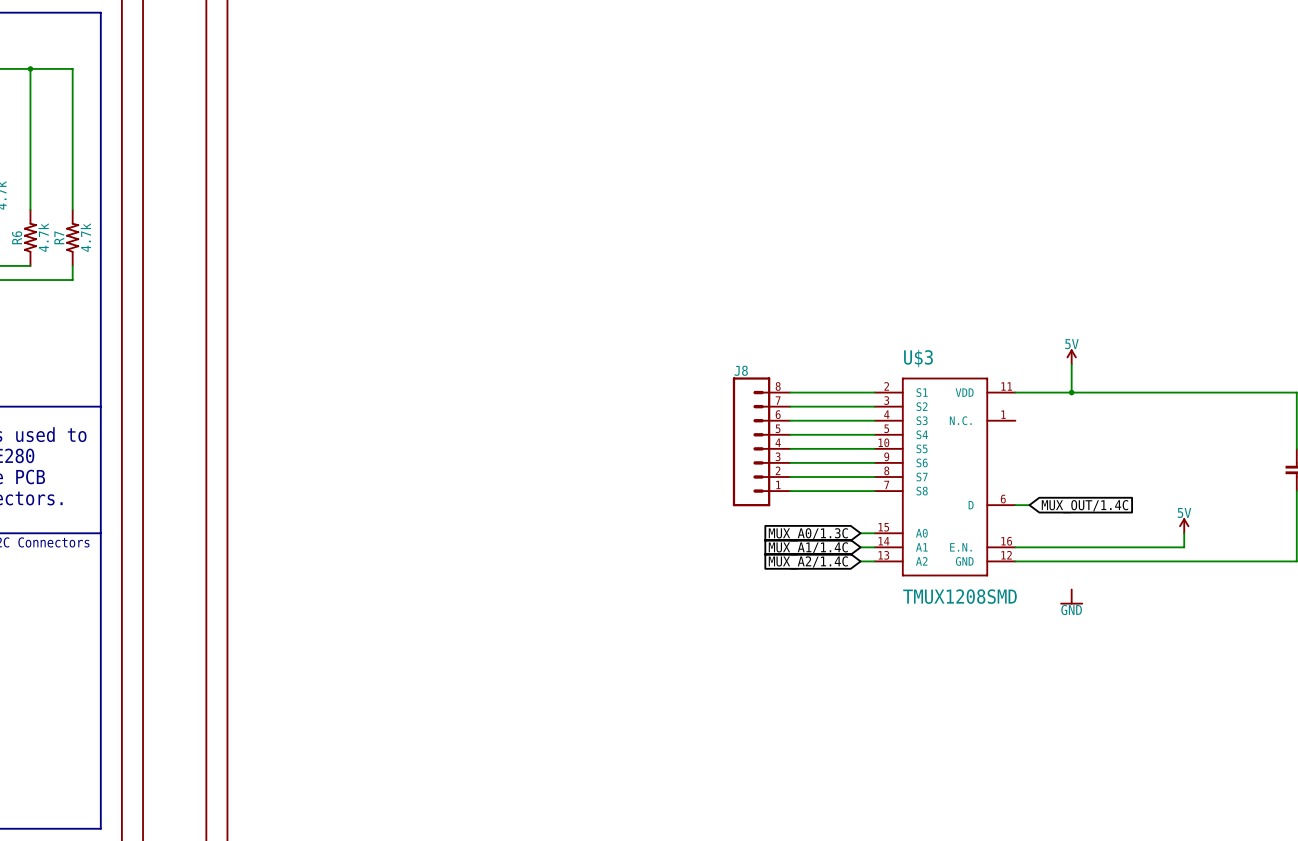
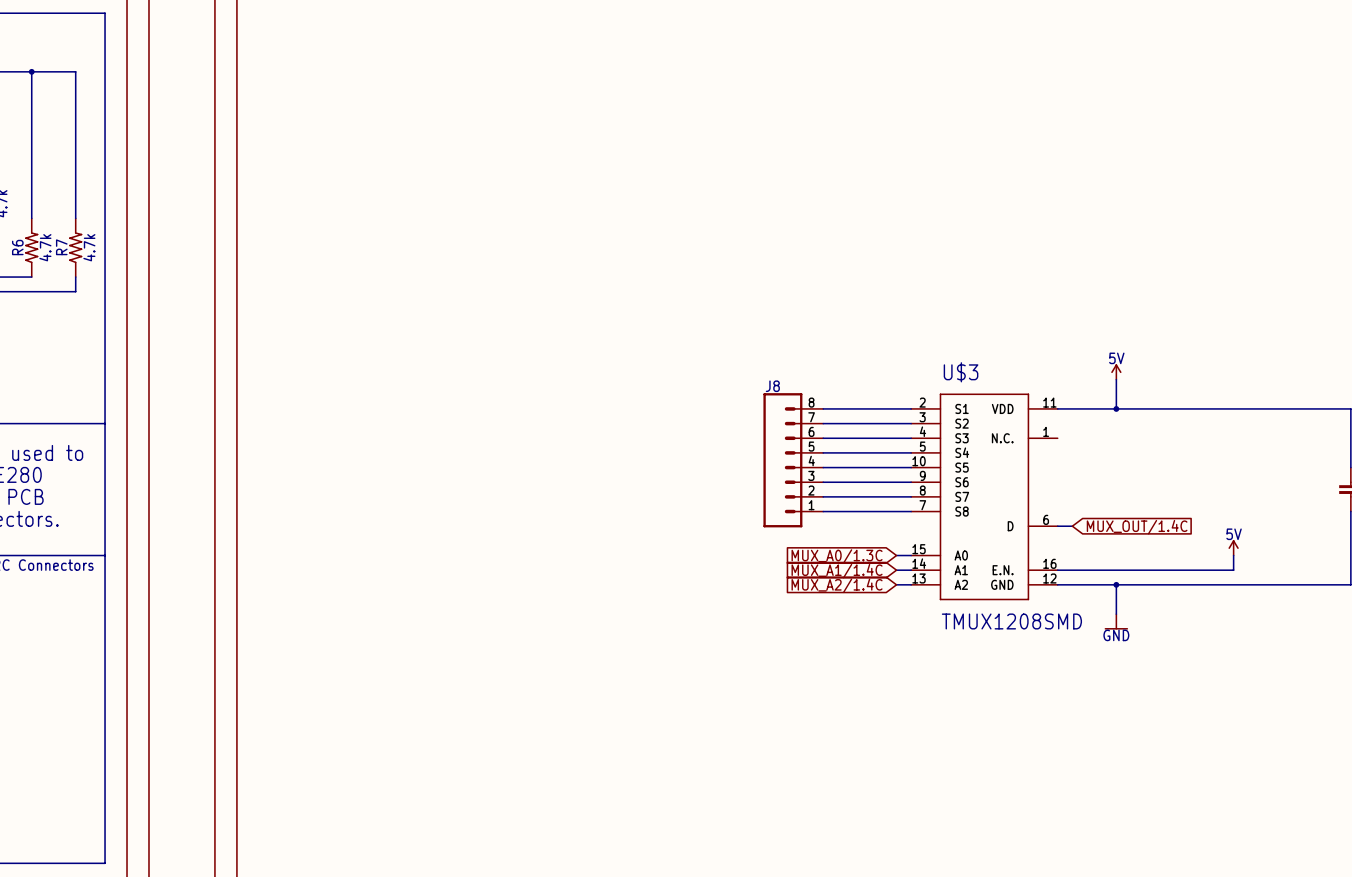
wire: none -> (1116, 584) (1116, 614)
junction: none -> (1116, 584)

